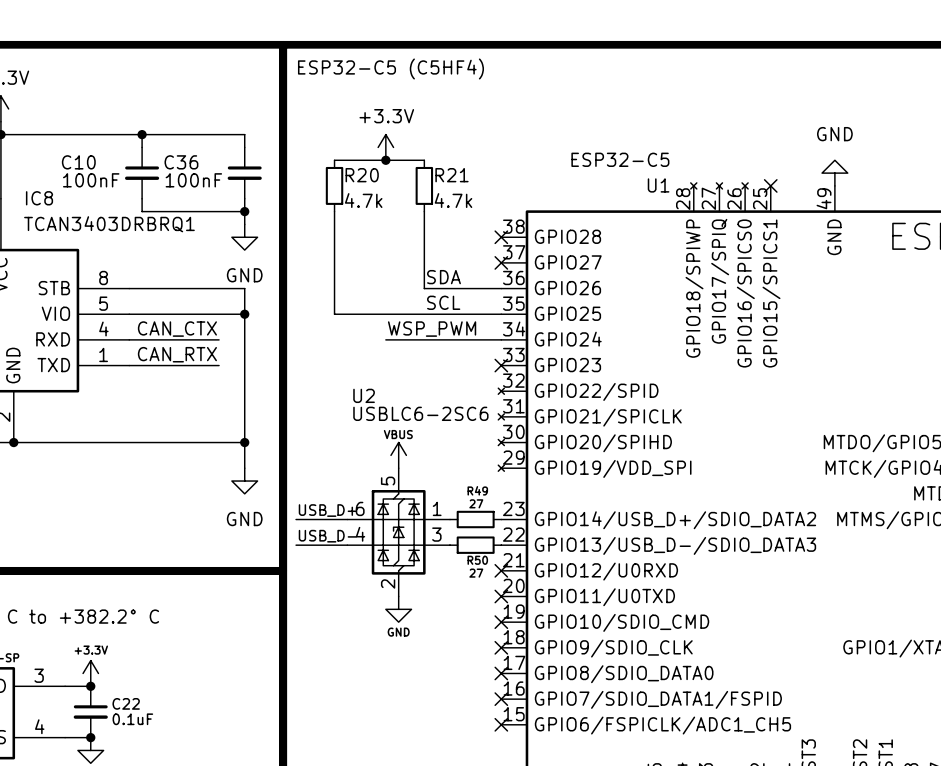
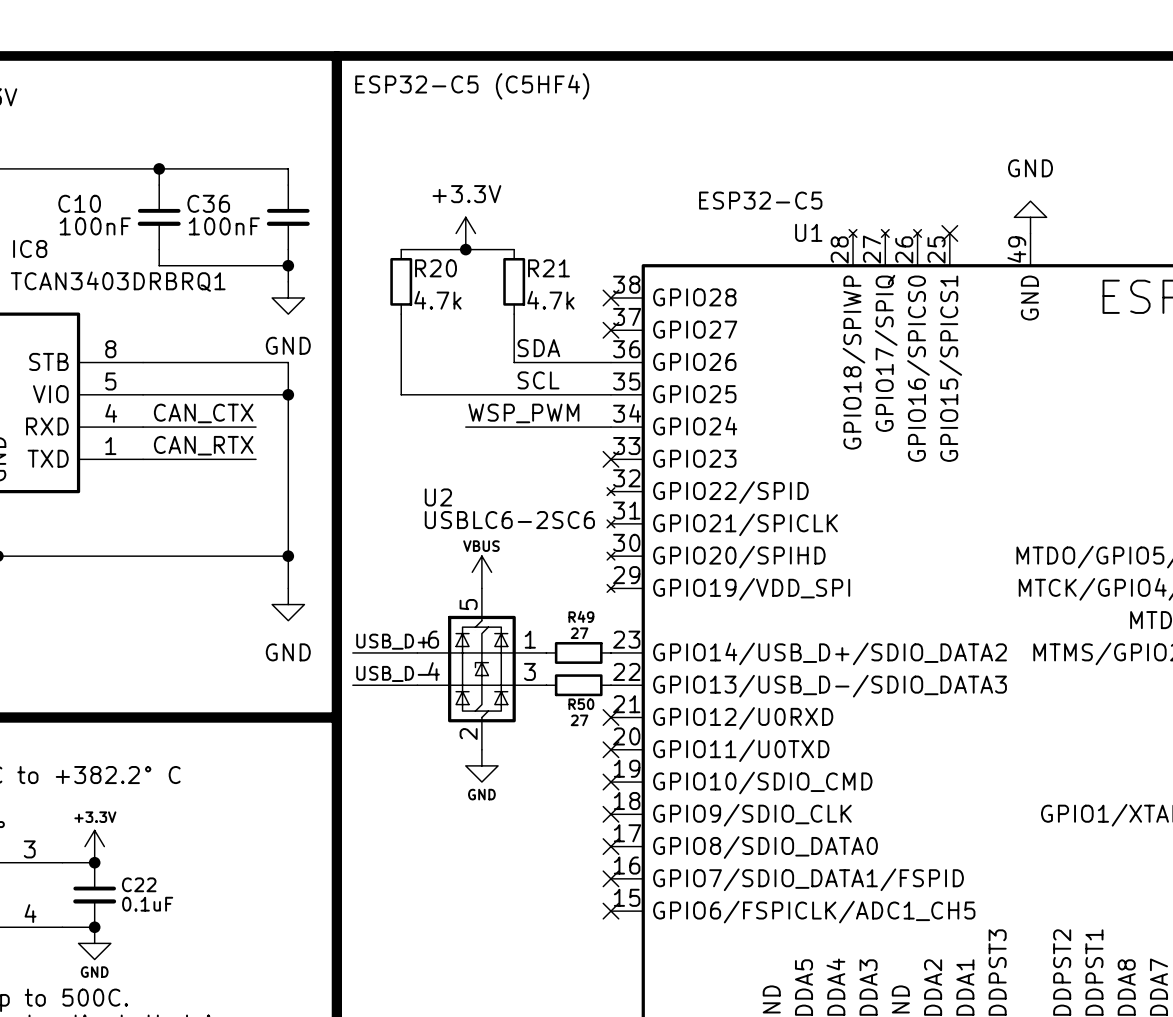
power symbol position: +3.3V (385, 147) -> +3.3V (465, 233)
wire: (334, 160) (424, 160) -> (401, 249) (514, 249)
junction position: (385, 160) -> (465, 249)
R20 position: (334, 185) -> (401, 281)
R21 position: (424, 185) -> (514, 281)
wire: (334, 211) (334, 250) -> none
wire: (424, 211) (424, 250) -> none

